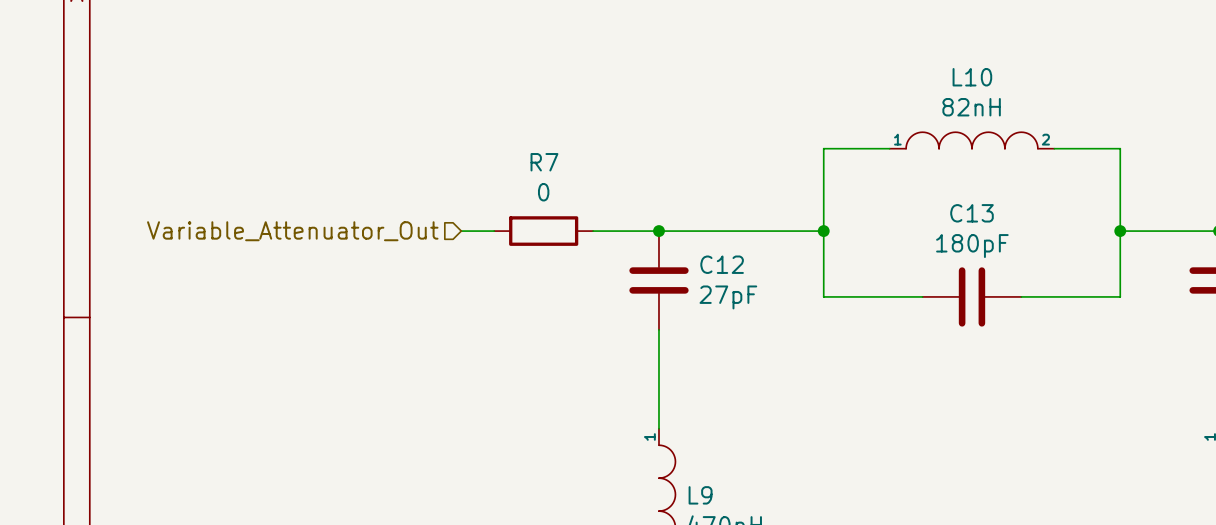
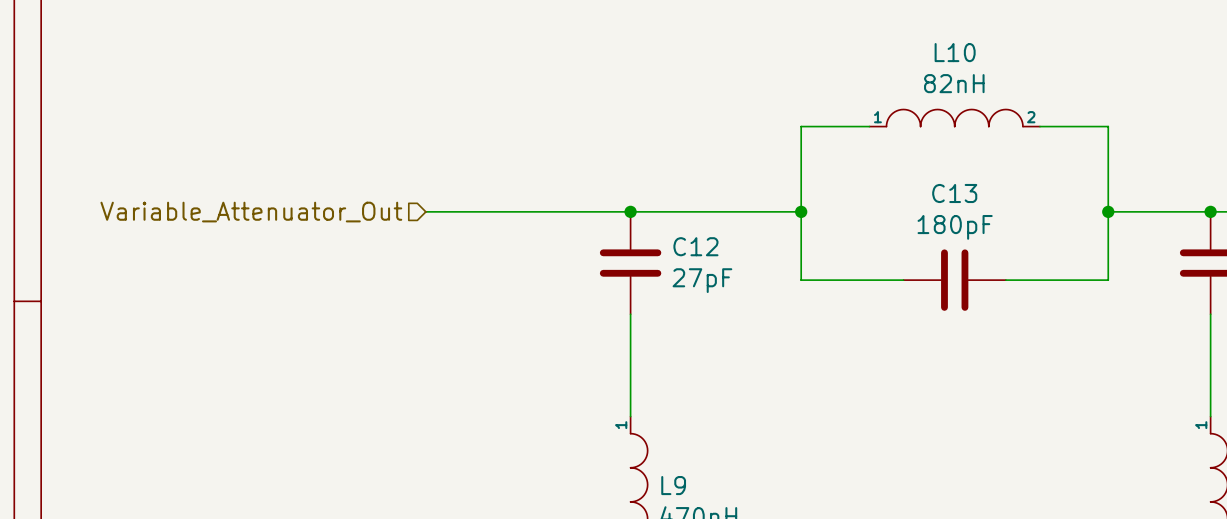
wire: none -> (459, 211) (562, 211)
R7: 0 (543, 231) -> none

